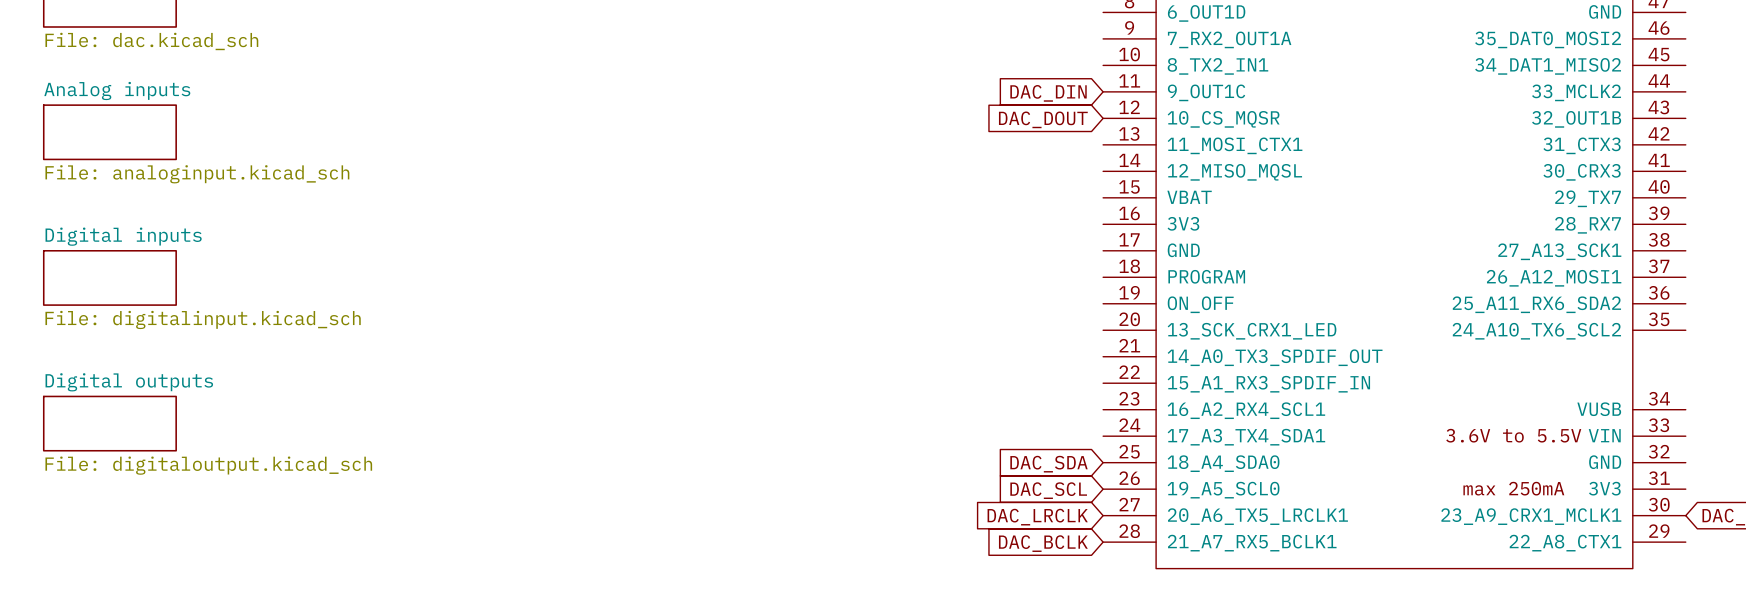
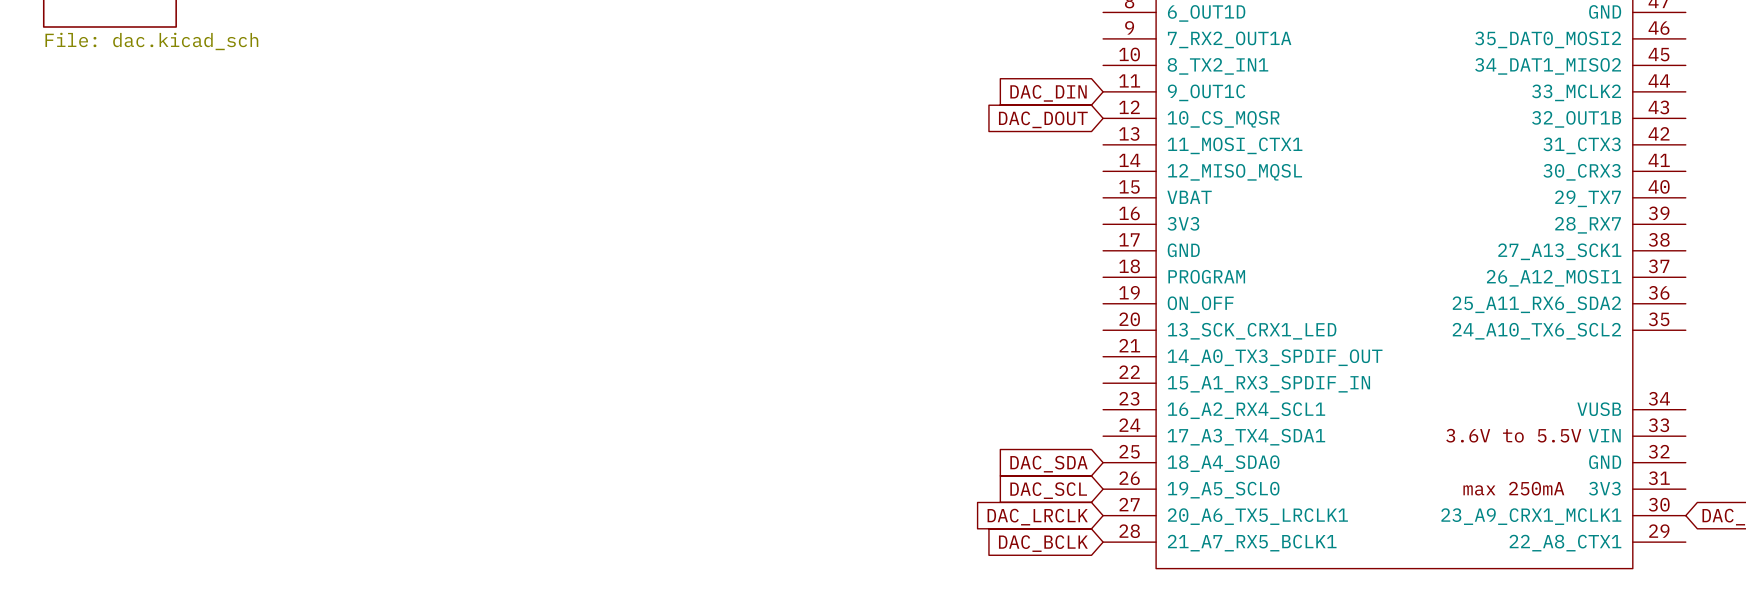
sheet Analog inputs: File: analoginput.kicad_sch (109, 132) -> none
sheet Digital inputs: File: digitalinput.kicad_sch (109, 277) -> none
sheet Digital outputs: File: digitaloutput.kicad_sch (109, 423) -> none

